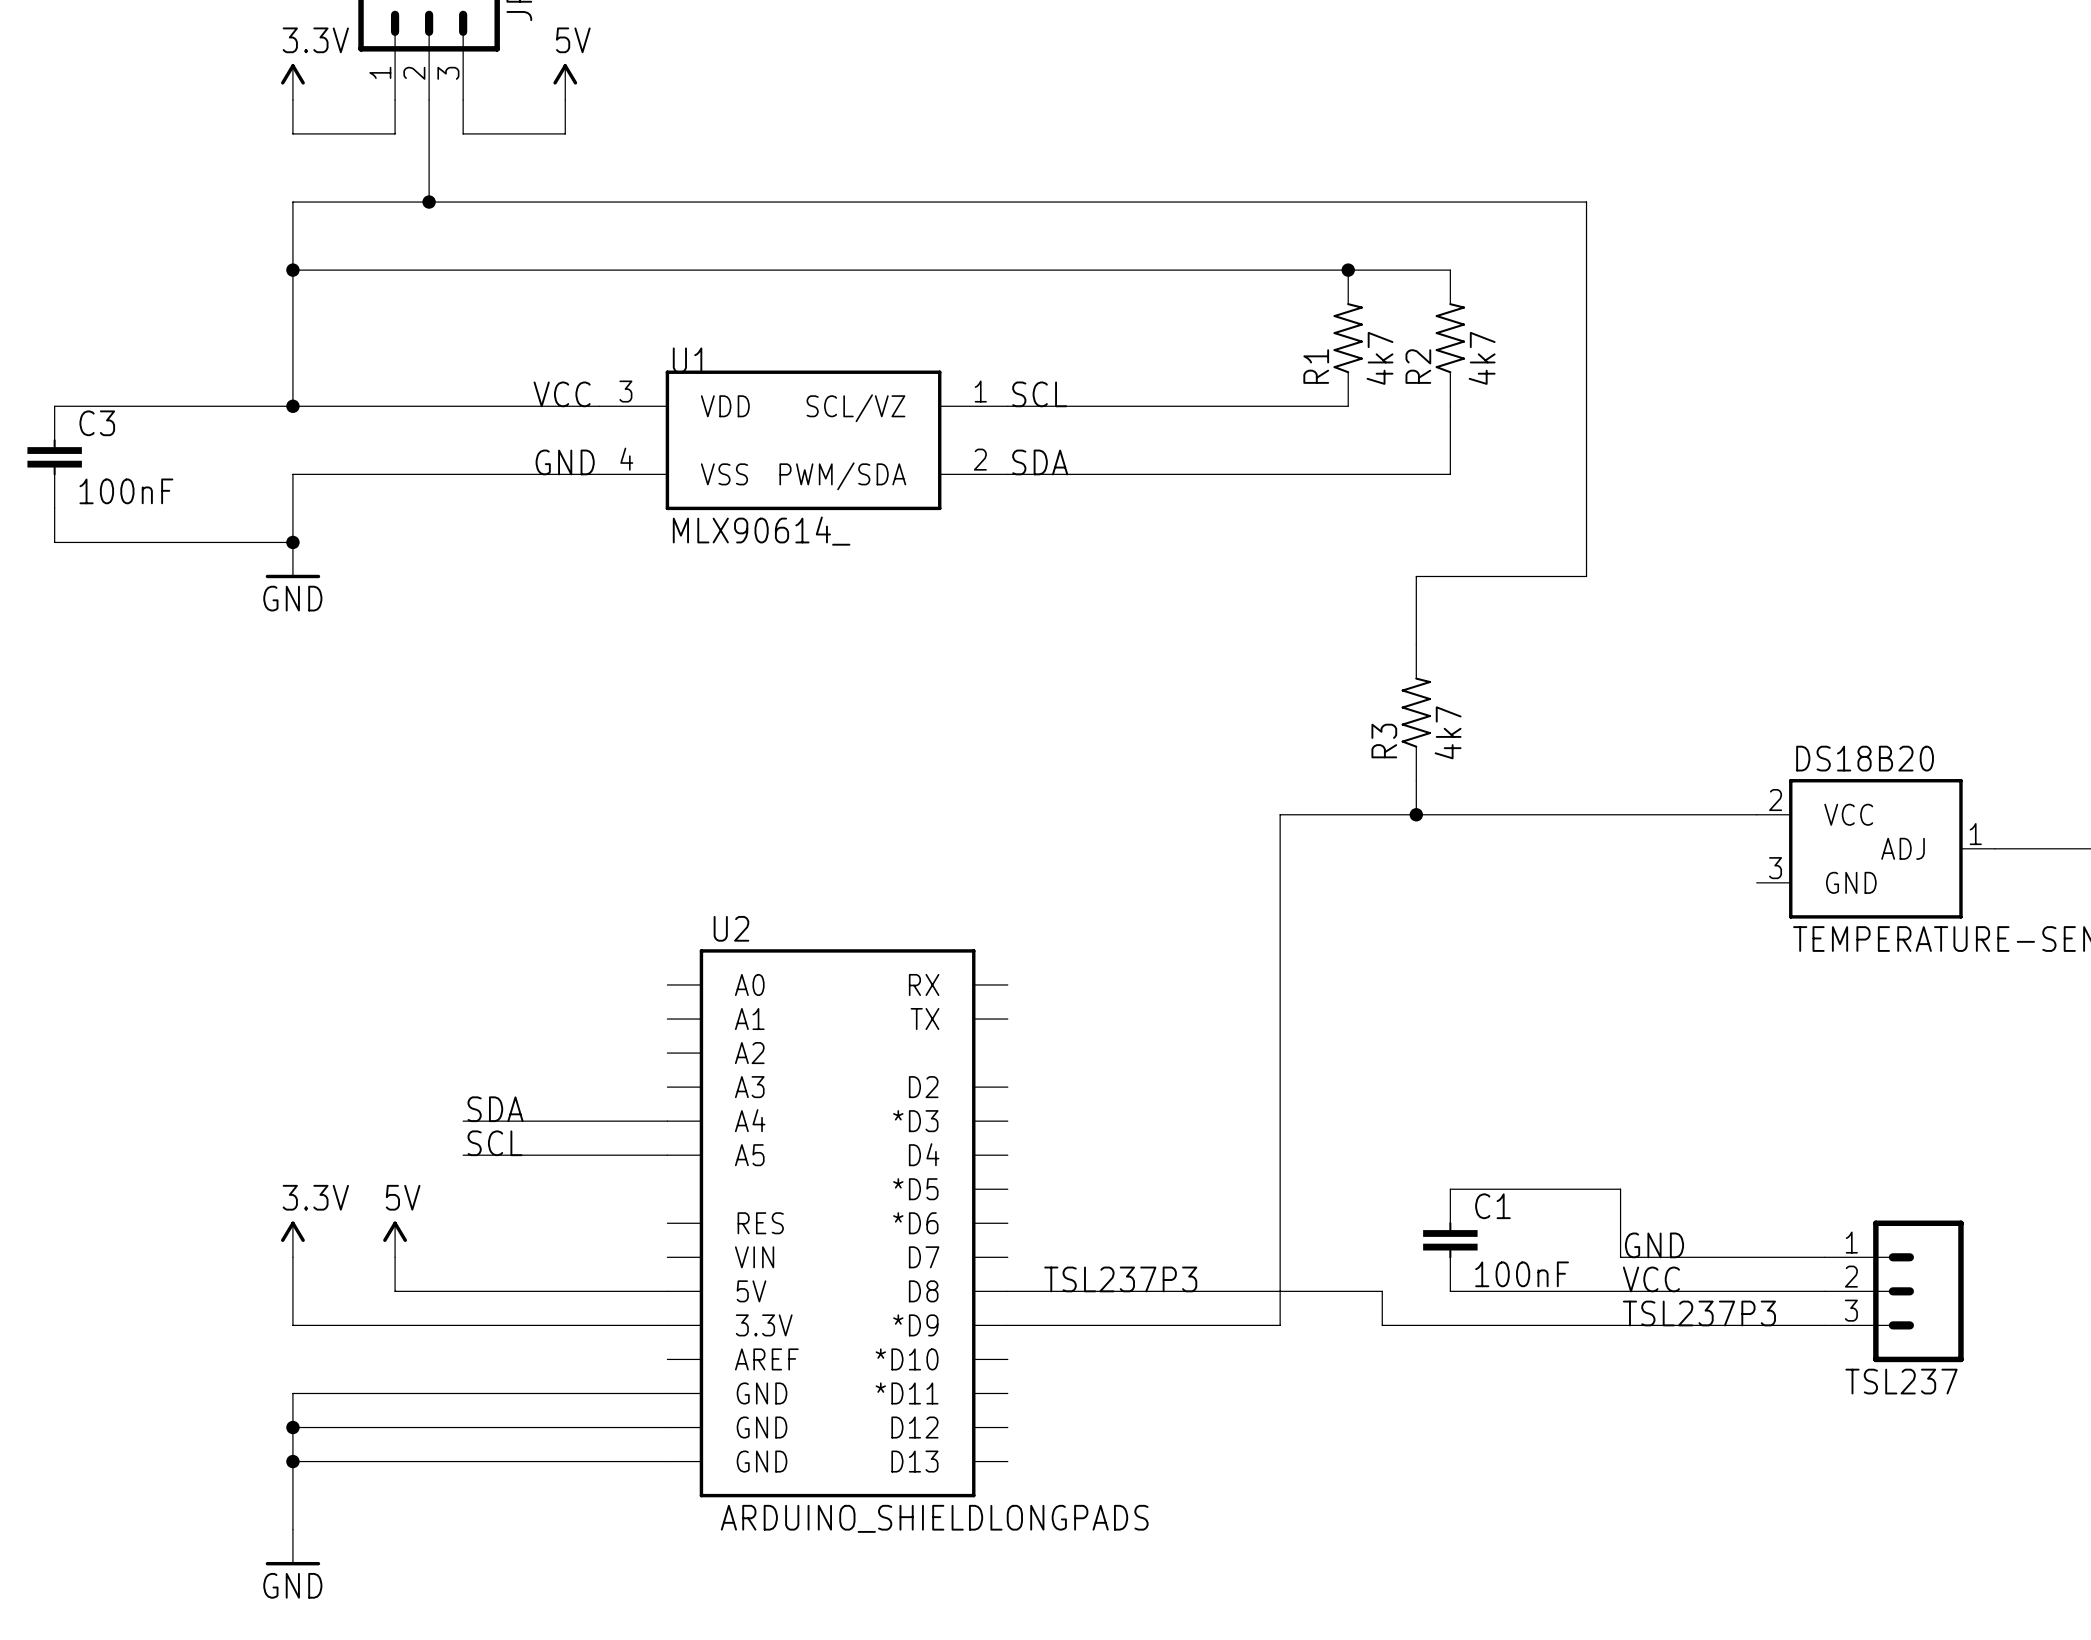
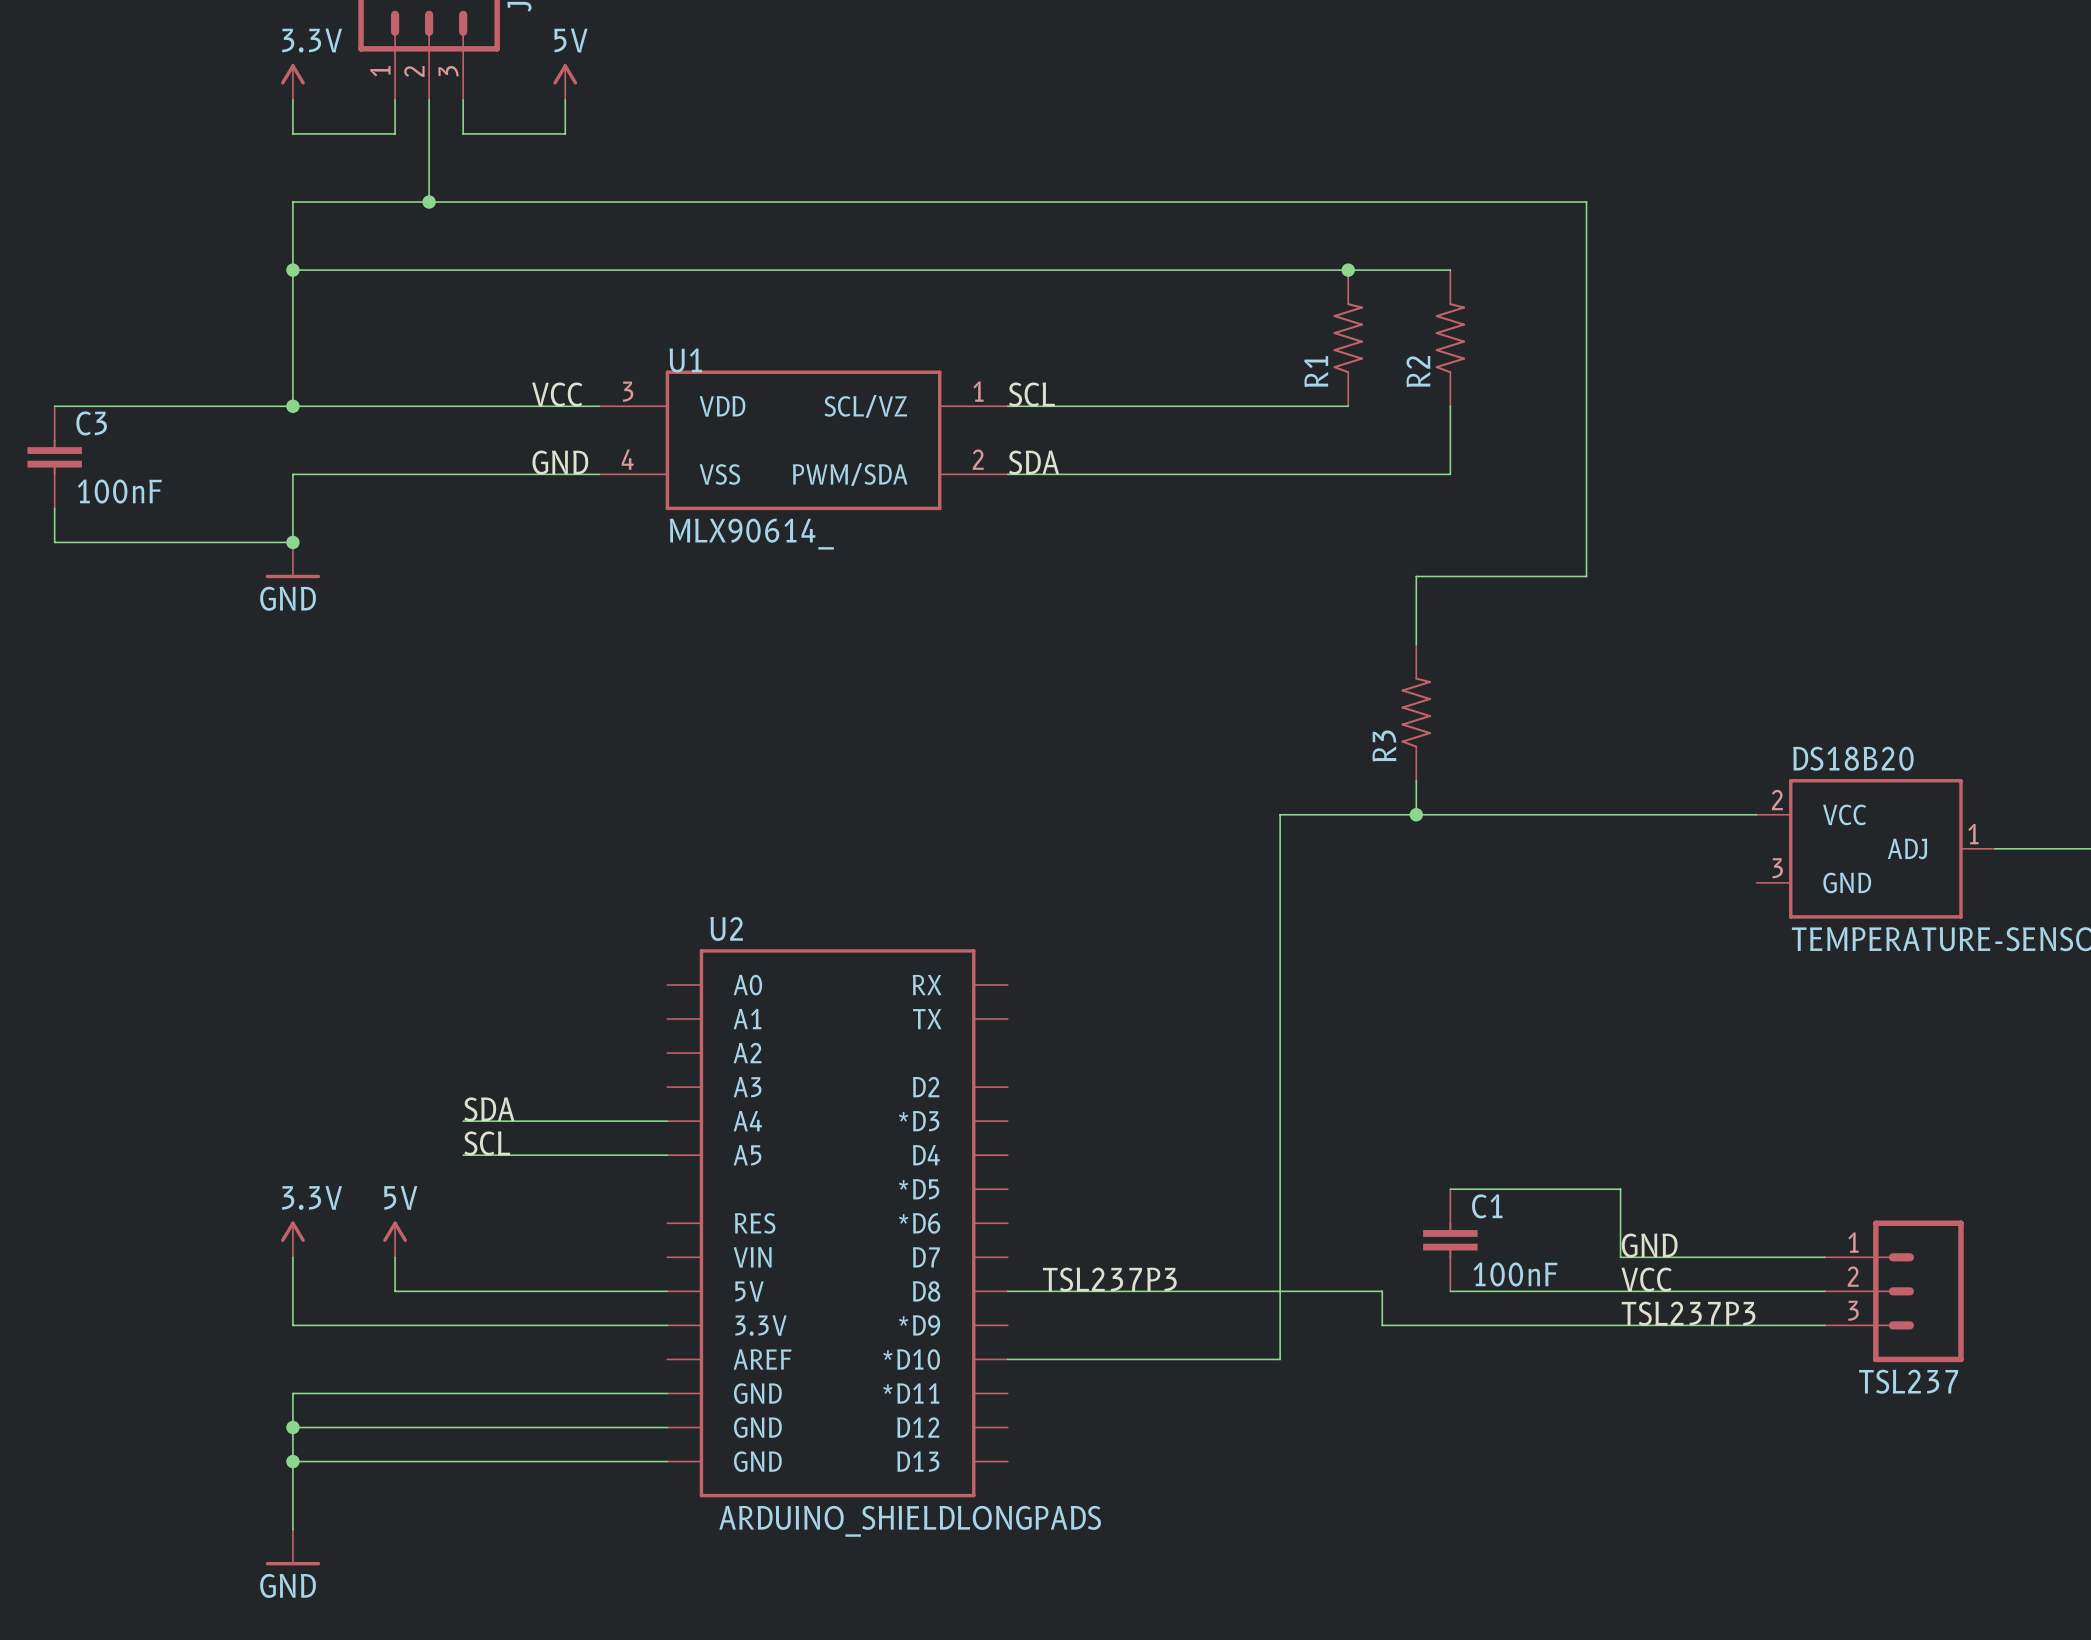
R1 value: 4k7 (1380, 358) -> none
R2 value: 4k7 (1482, 358) -> none
R3 value: 4k7 (1448, 732) -> none
wire: (1007, 1325) (1280, 1325) -> (1007, 1359) (1280, 1359) (1280, 1325)

